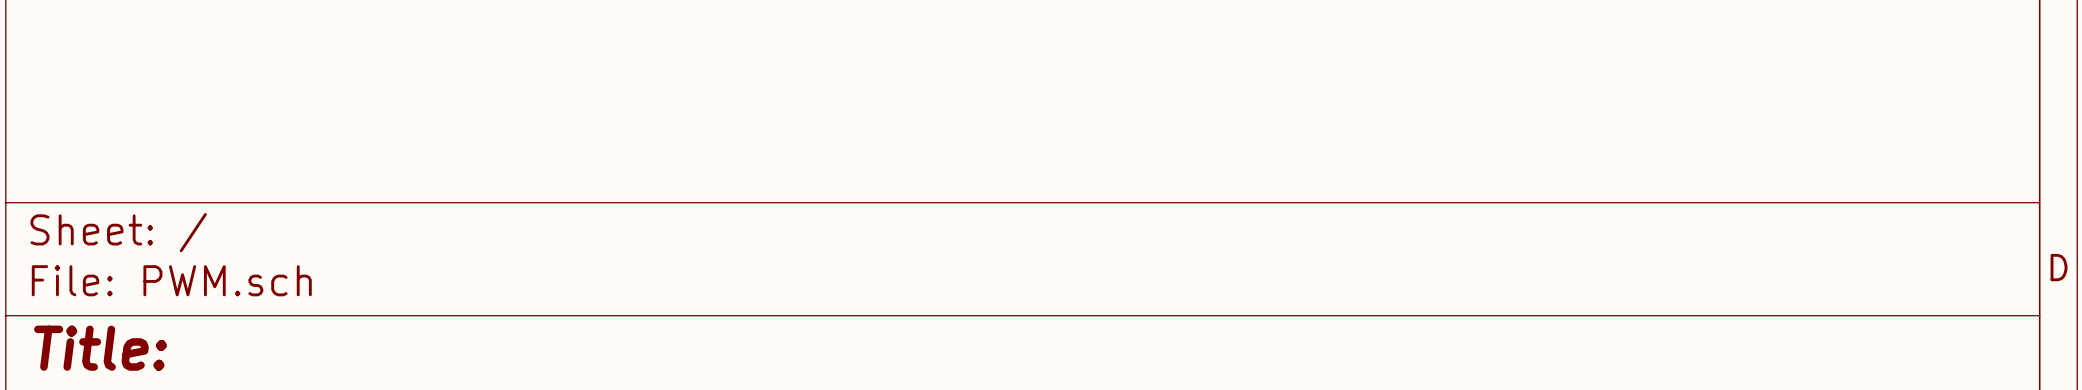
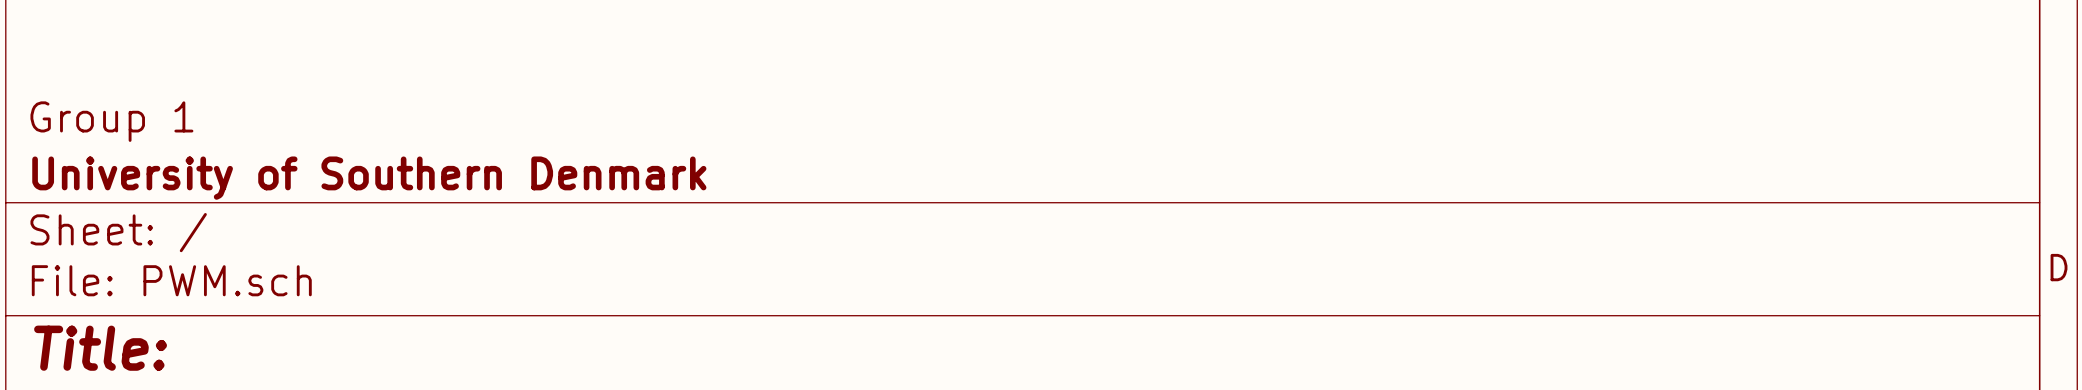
title block: none -> Group 1 (111, 121)
title block: none -> University of Southern Denmark (369, 178)

